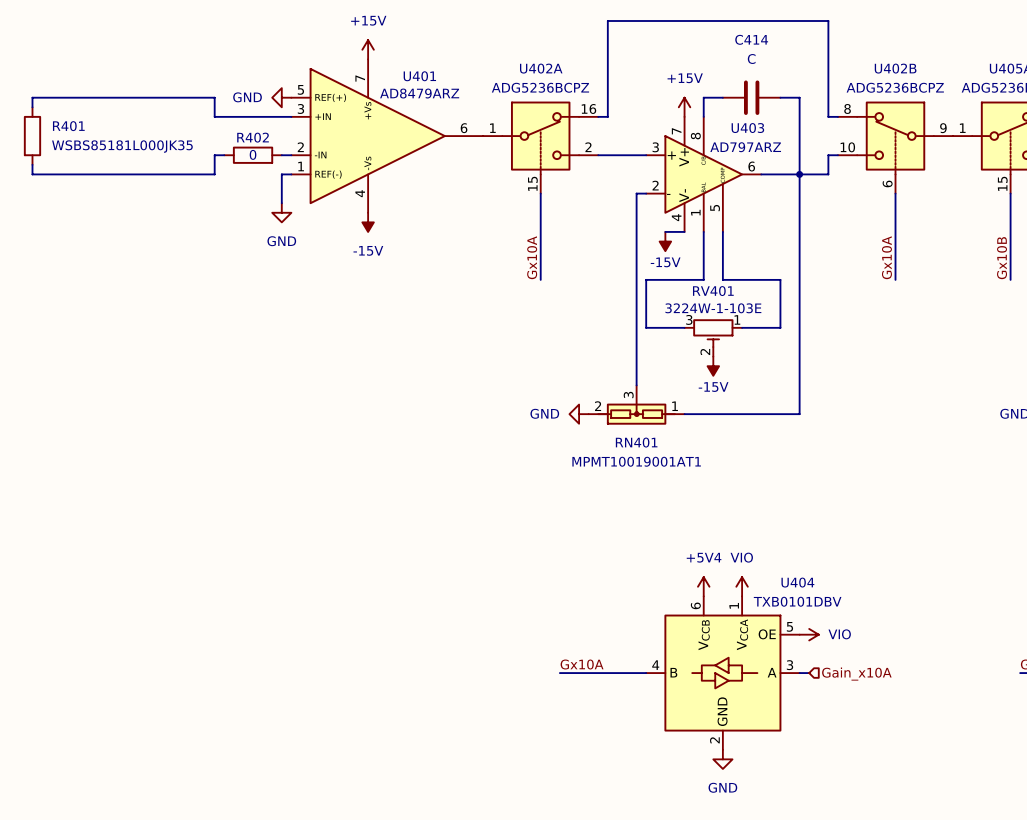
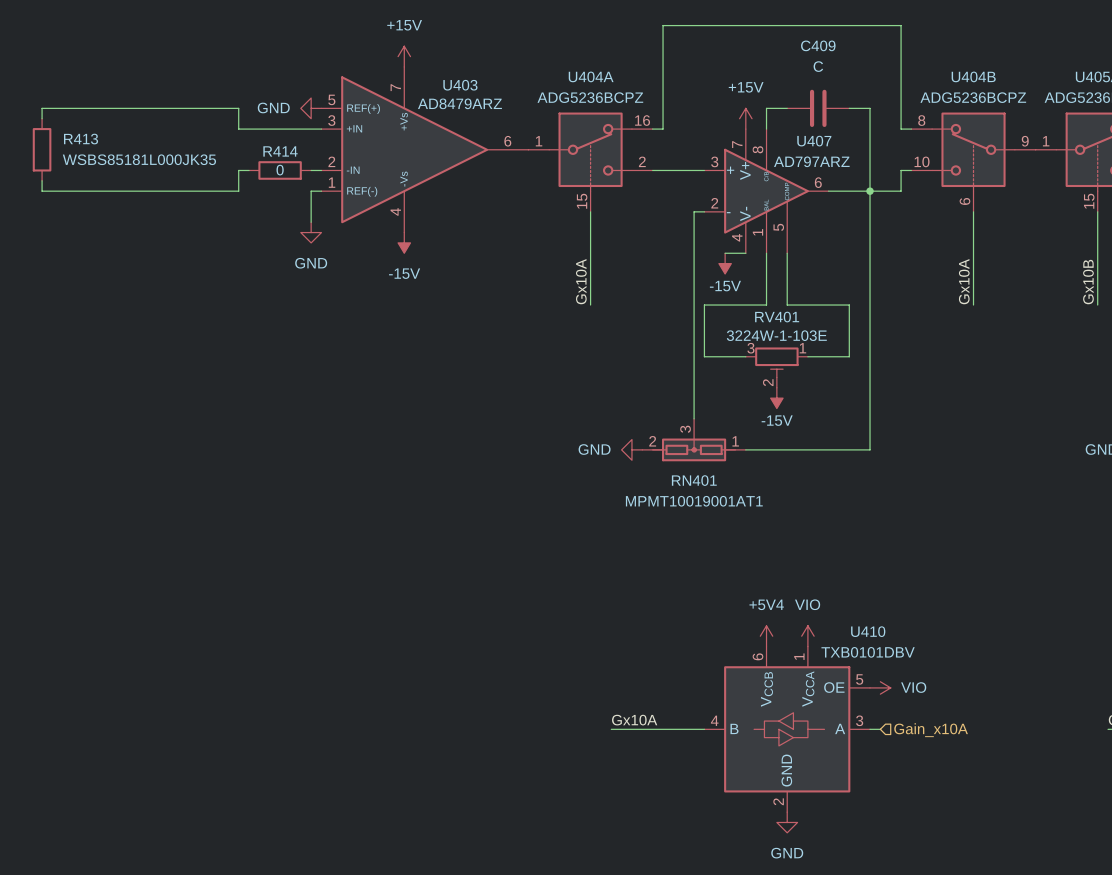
C414 name: C414 (751, 39) -> C409 (818, 45)
U402A name: U402A (541, 68) -> U404A (591, 76)
U402B name: U402B (895, 68) -> U404B (973, 76)
U401 name: U401 (419, 76) -> U403 (460, 85)
R401 name: R401 (68, 126) -> R413 (81, 139)
U403 name: U403 (747, 128) -> U407 (814, 141)
R402 name: R402 (253, 137) -> R414 (280, 151)
U404 name: U404 (797, 582) -> U410 (868, 631)

